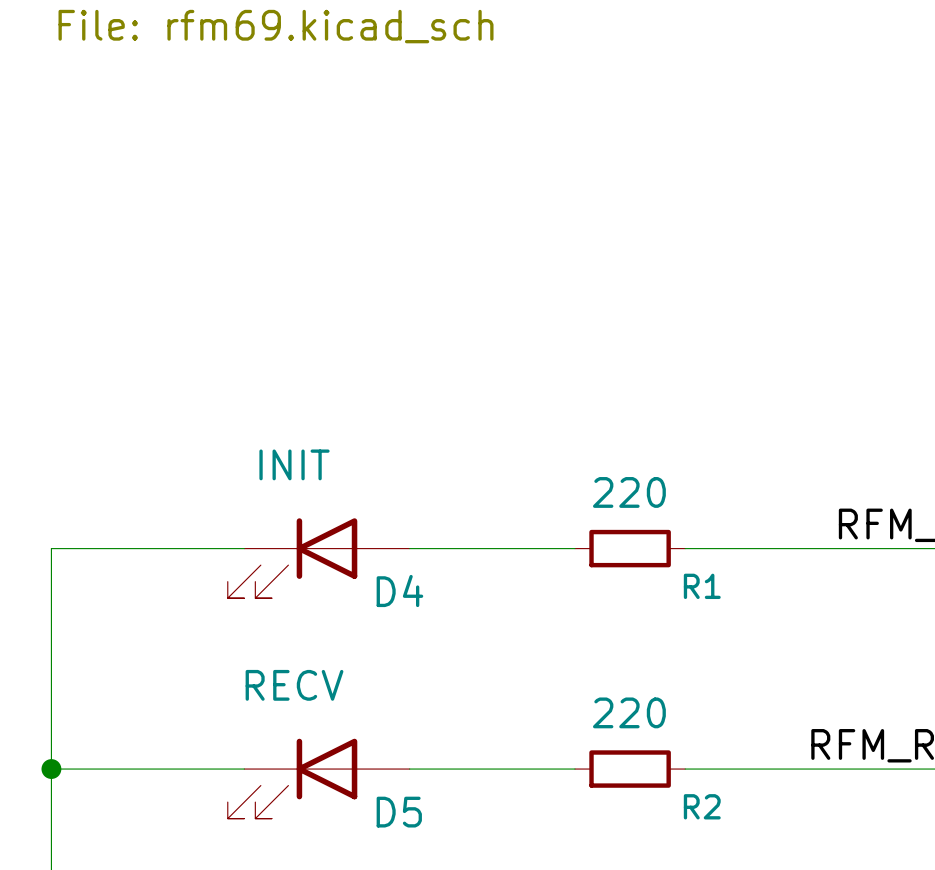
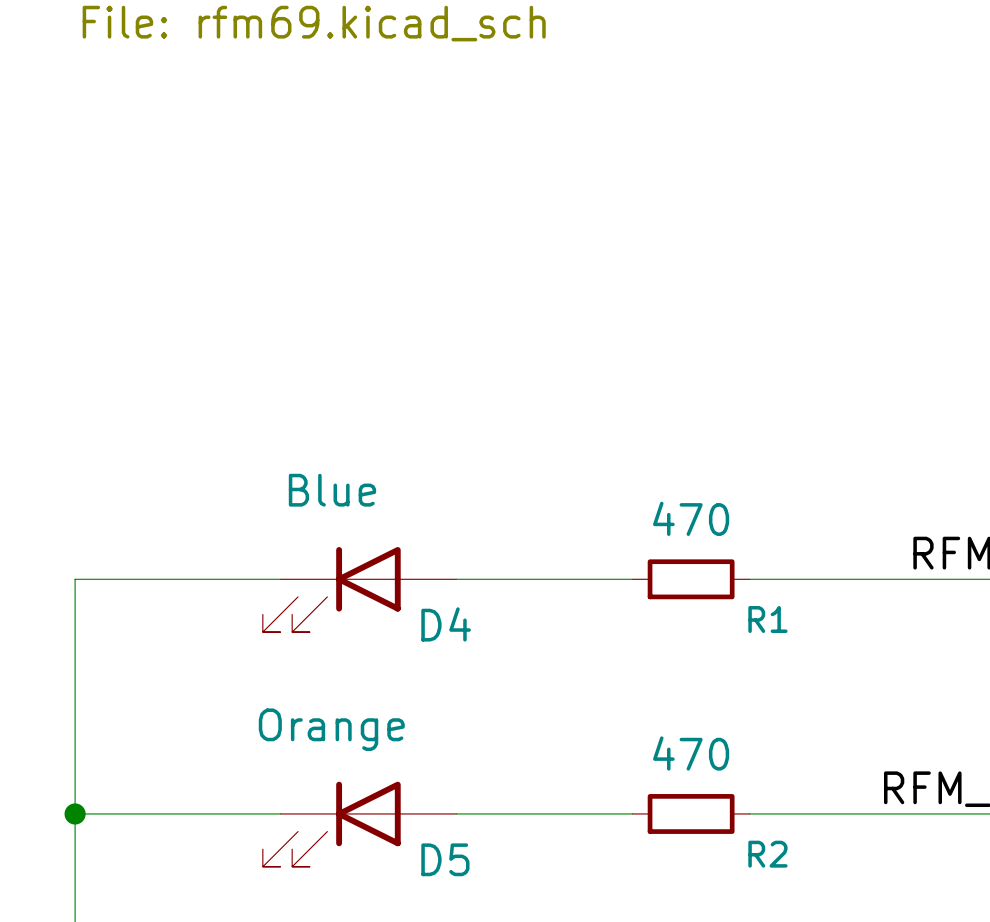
D4 value: INIT (294, 464) -> Blue (332, 490)
R1 value: 220 (629, 492) -> 470 (691, 518)
D5 value: RECV (294, 685) -> Orange (331, 729)
R2 value: 220 (629, 712) -> 470 (691, 753)

